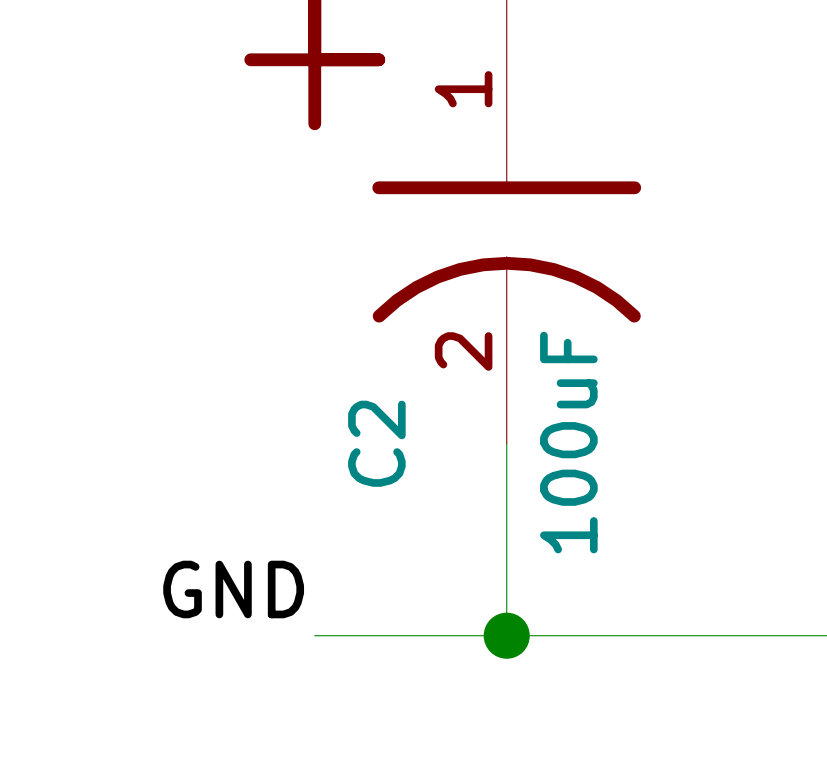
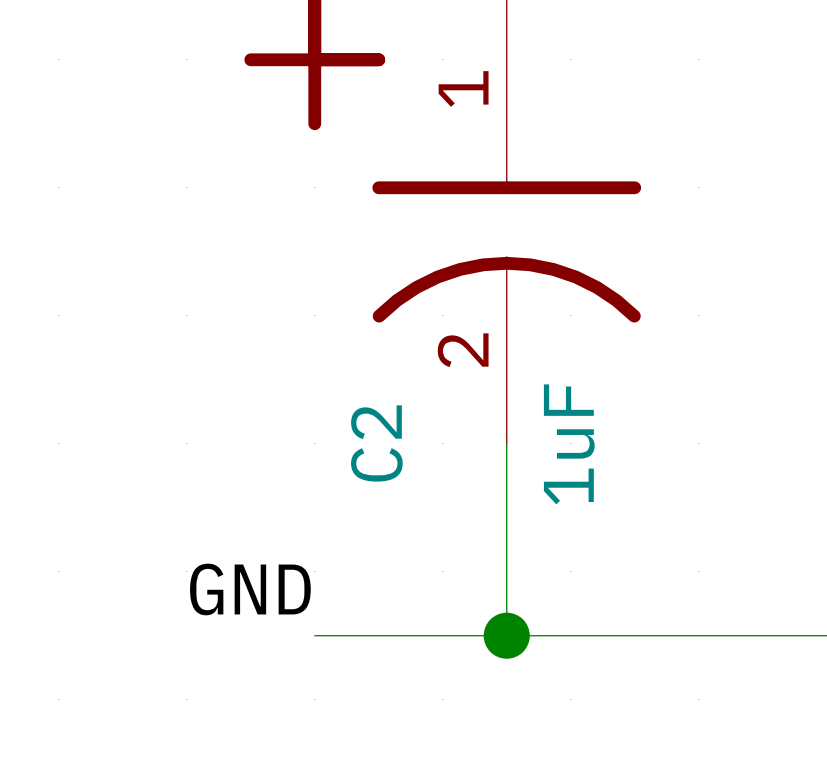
C2 value: 100uF (568, 442) -> 1uF (569, 444)

